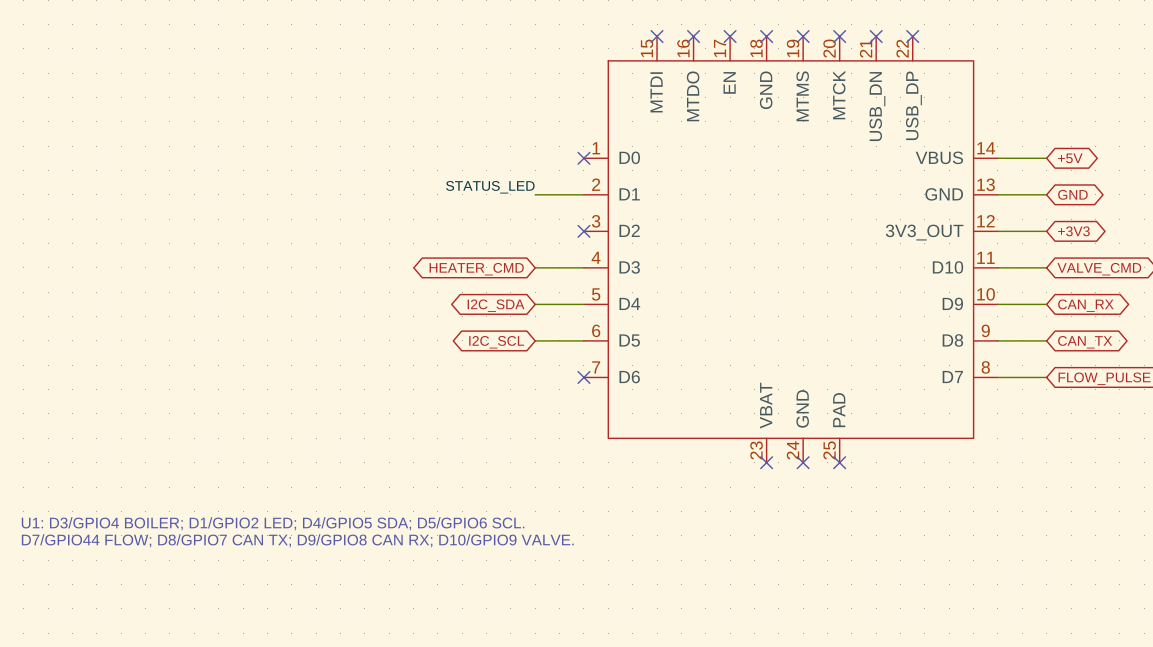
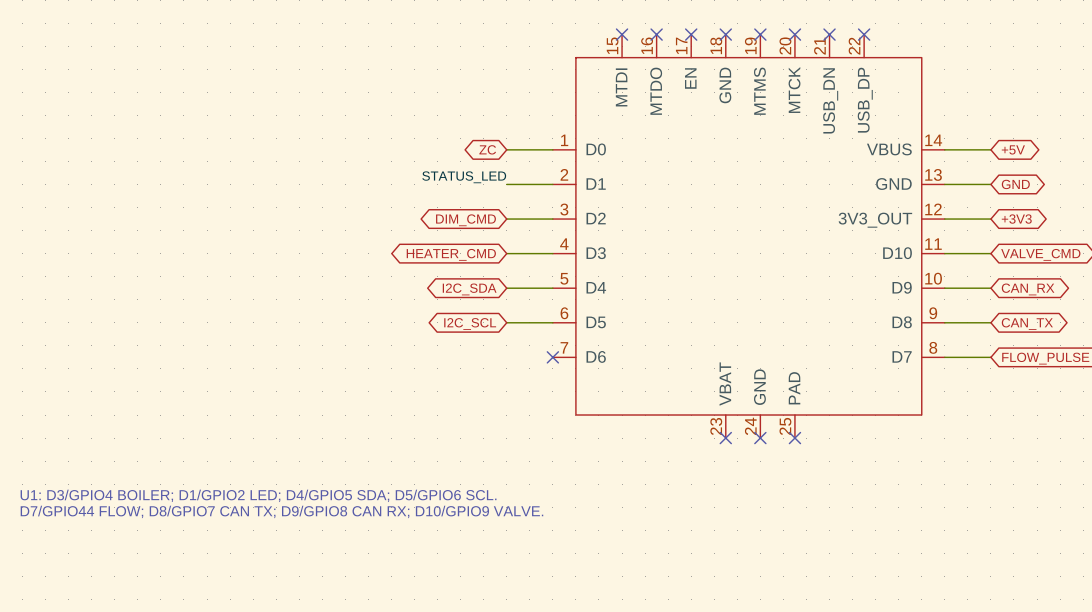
global label: none -> ZC (487, 149)
wire: none -> (506, 149) (552, 149)
no-connect mark: (583, 158) -> none
wire: none -> (506, 219) (552, 219)
no-connect mark: (583, 231) -> none
global label: none -> DIM_CMD (465, 220)

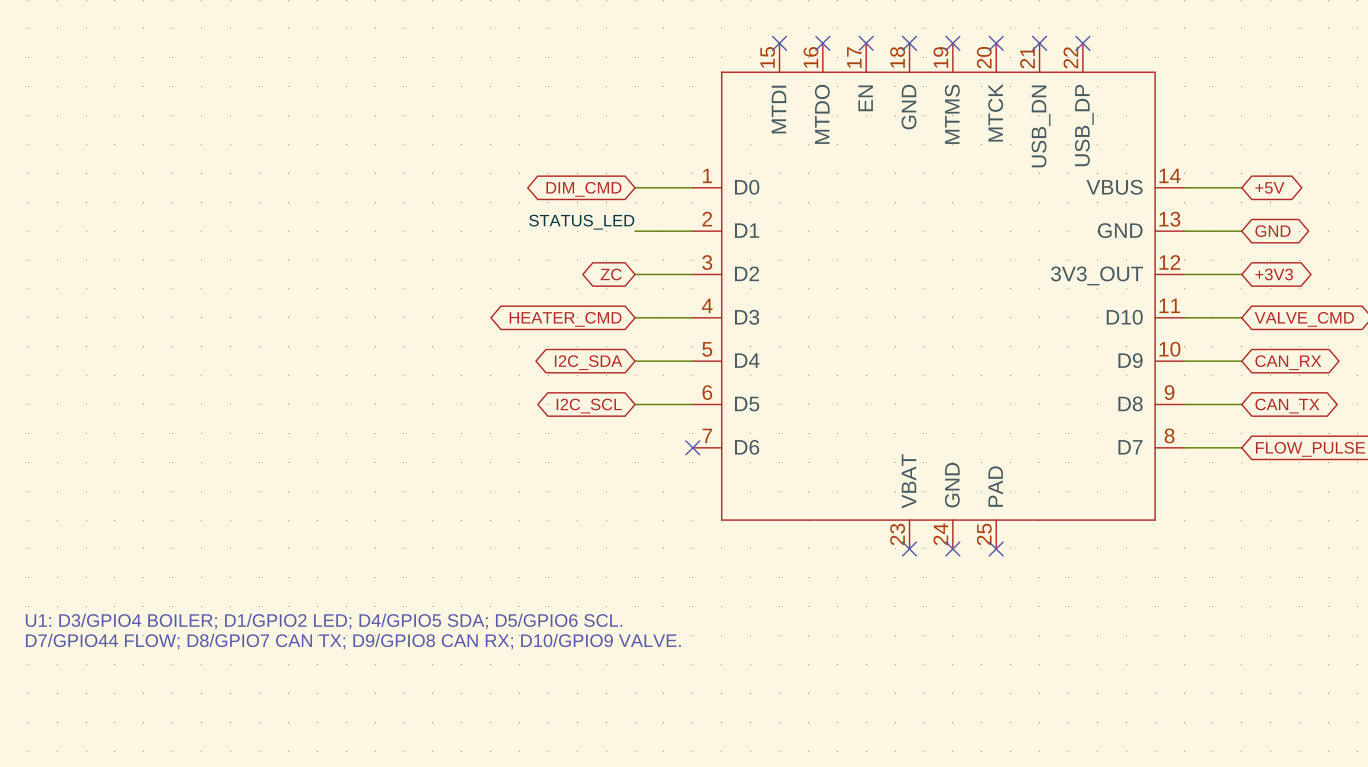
global label: ZC (487, 149) -> DIM_CMD (583, 189)
global label: DIM_CMD (465, 220) -> ZC (611, 274)

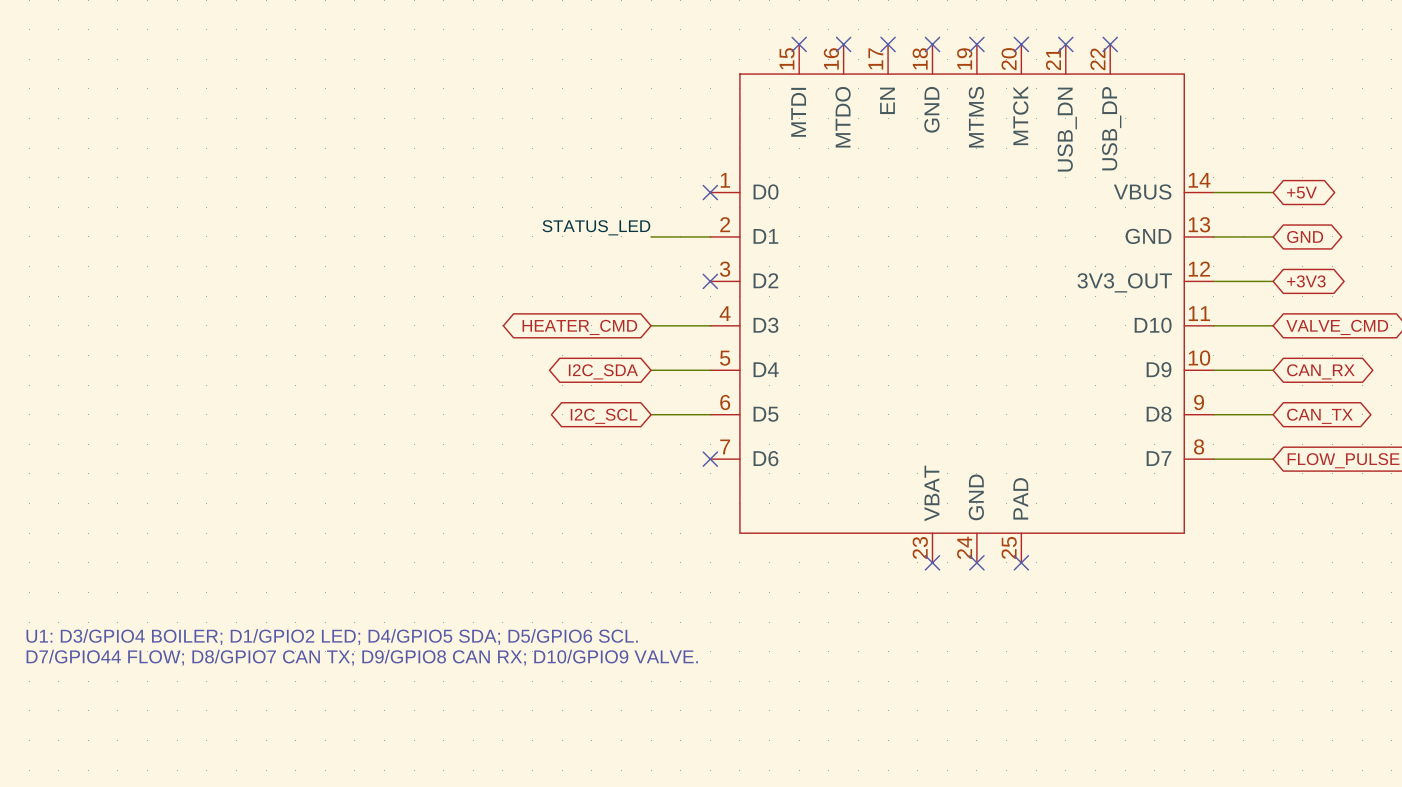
wire: (635, 187) (692, 187) -> none
no-connect mark: none -> (710, 192)
global label: DIM_CMD (583, 189) -> none
global label: ZC (611, 274) -> none
wire: (635, 274) (692, 274) -> none
no-connect mark: none -> (710, 281)

